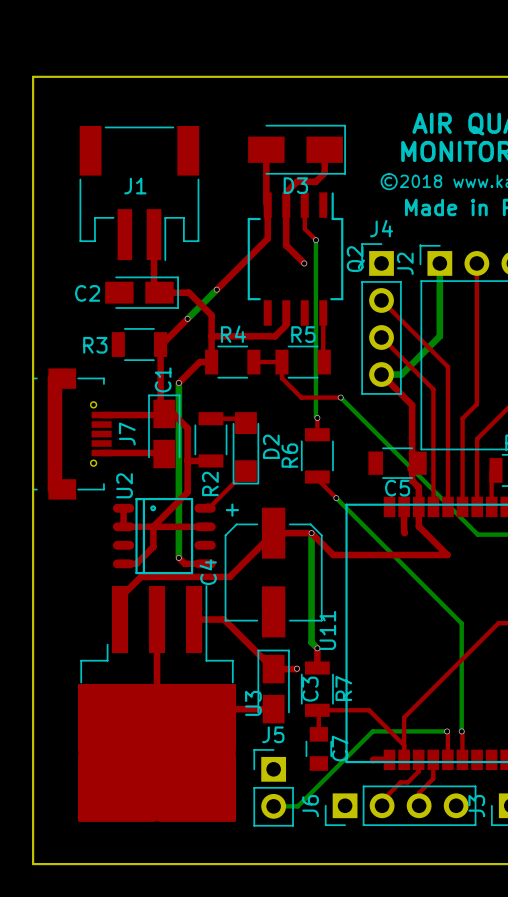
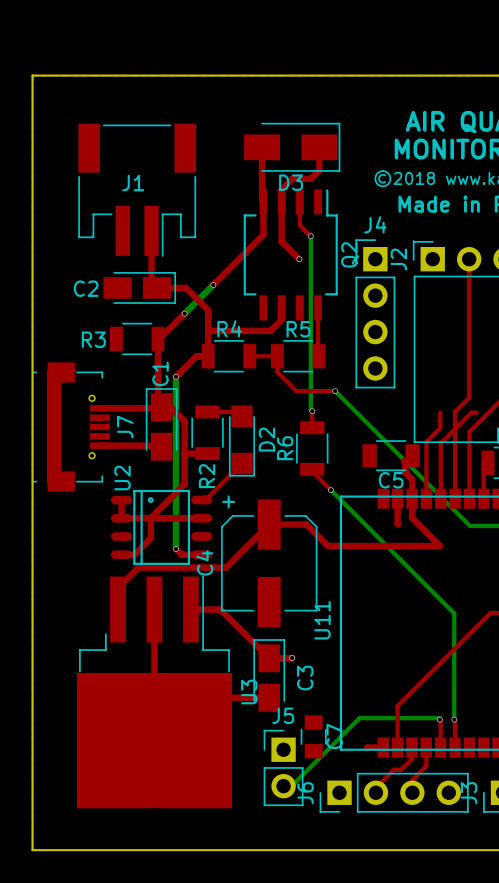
bottom track: (439, 263) (439, 336) (401, 374) (381, 374) -> none
top track: (381, 300) (448, 366) (448, 450) -> (476, 412) (471, 412) (440, 443)
top track: (381, 337) (433, 389) (433, 449) -> (440, 412) (440, 428) (426, 441)
top track: (381, 374) (412, 405) (412, 463) -> none
bottom track: (311, 533) (311, 642) (317, 648) -> none
via: (311, 533) -> none
top track: (317, 648) (317, 668) -> none
via: (317, 648) -> none
R7: (317, 689) -> none
bottom track: none -> (439, 718) (359, 718) (291, 786) (283, 786)
bottom track: (447, 731) (372, 731) (297, 806) (273, 806) -> none
top track: (318, 734) (317, 710) (369, 710) (404, 745) -> none
J5 position: (273, 787) -> (283, 767)

